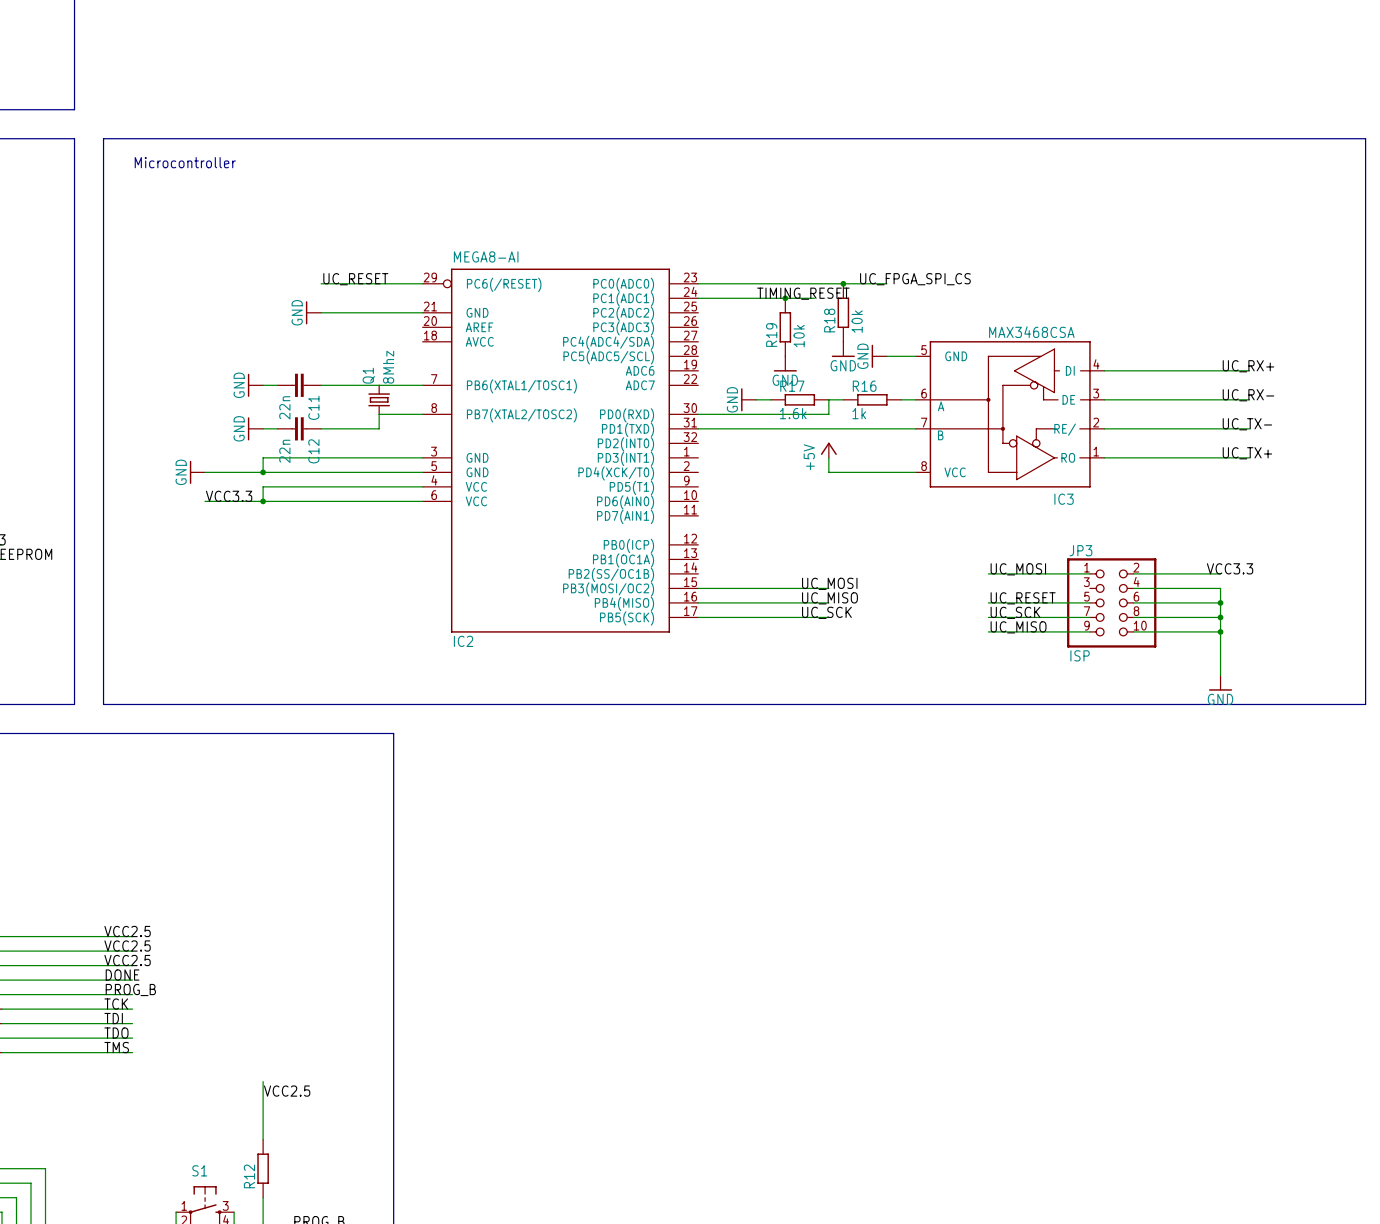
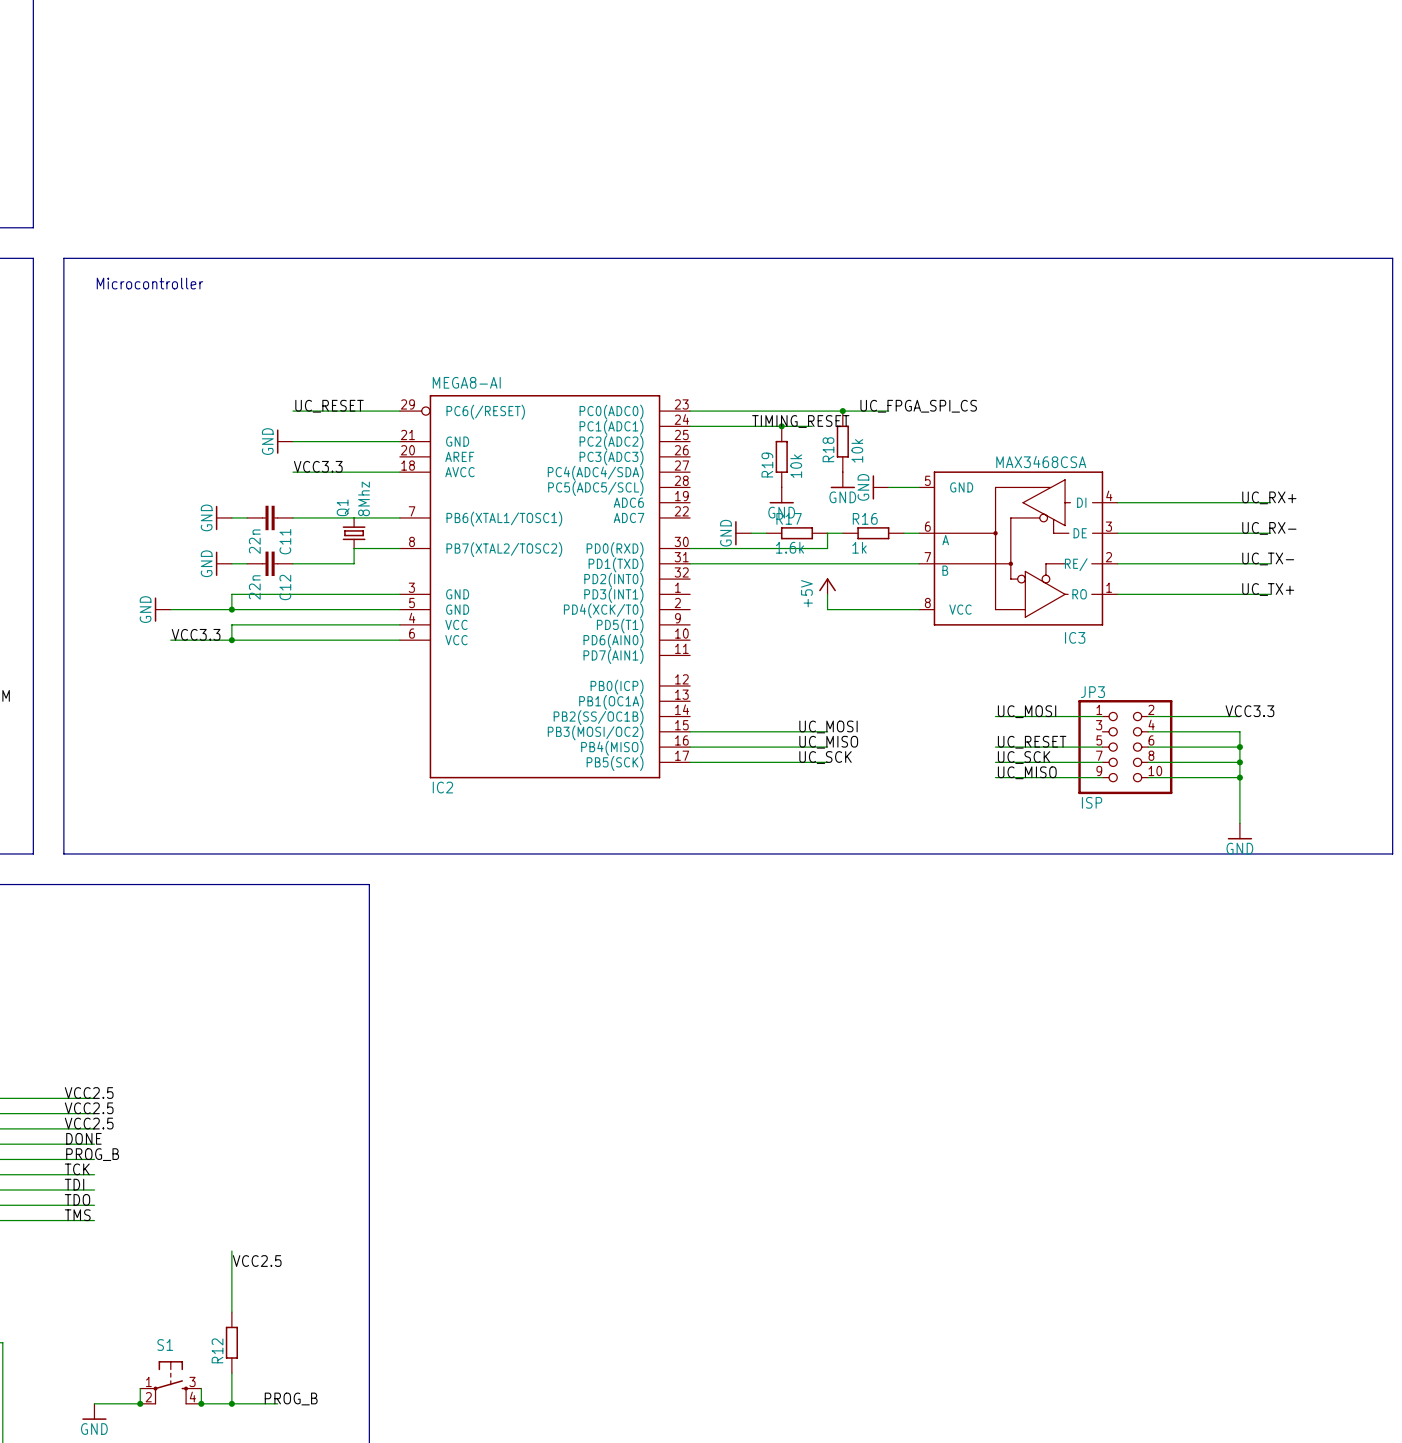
label: none -> VCC3.3 (318, 466)
wire: none -> (292, 472) (399, 472)

